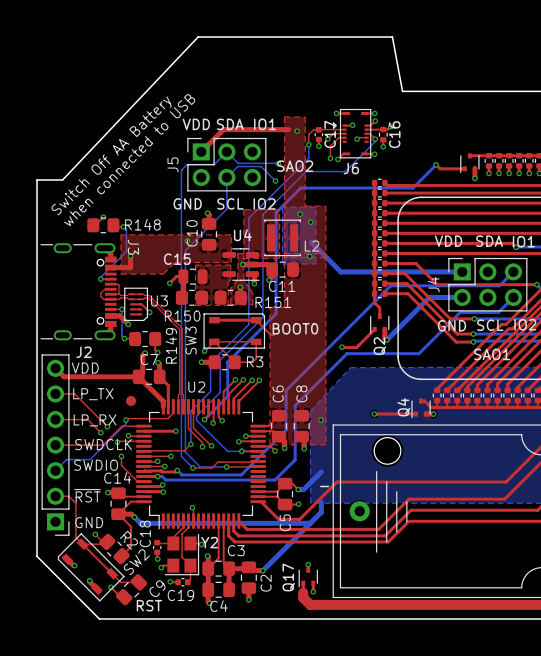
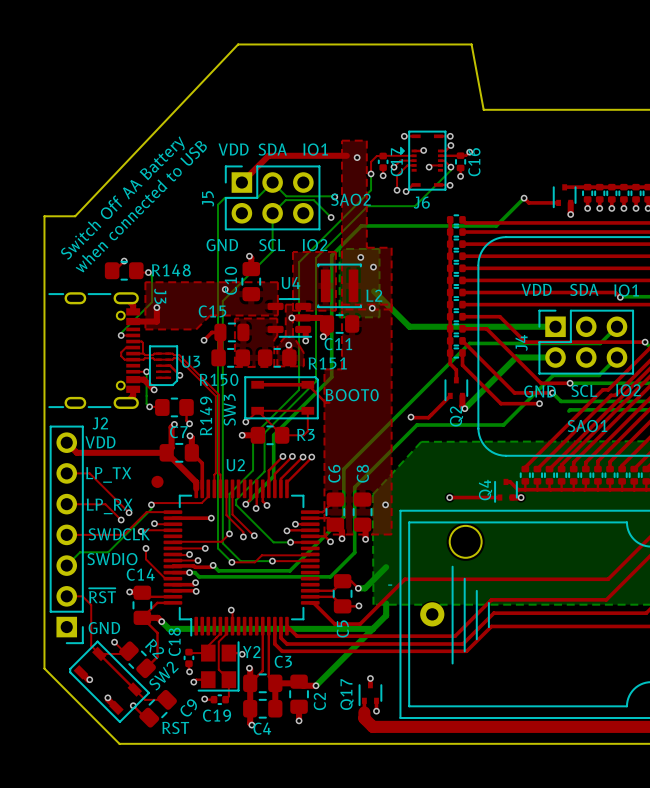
top track: (384, 283) (406, 283) (457, 334) (473, 334) -> (462, 340) (514, 392) (552, 392)
top track: (384, 293) (407, 293) (456, 342) (473, 342) -> (462, 353) (462, 365) (500, 403) (539, 403)
bottom track: none -> (552, 392) (561, 401) (568, 401)
via: none -> (552, 392)
via: (473, 334) -> none
via: none -> (539, 403)
via: (473, 342) -> none

